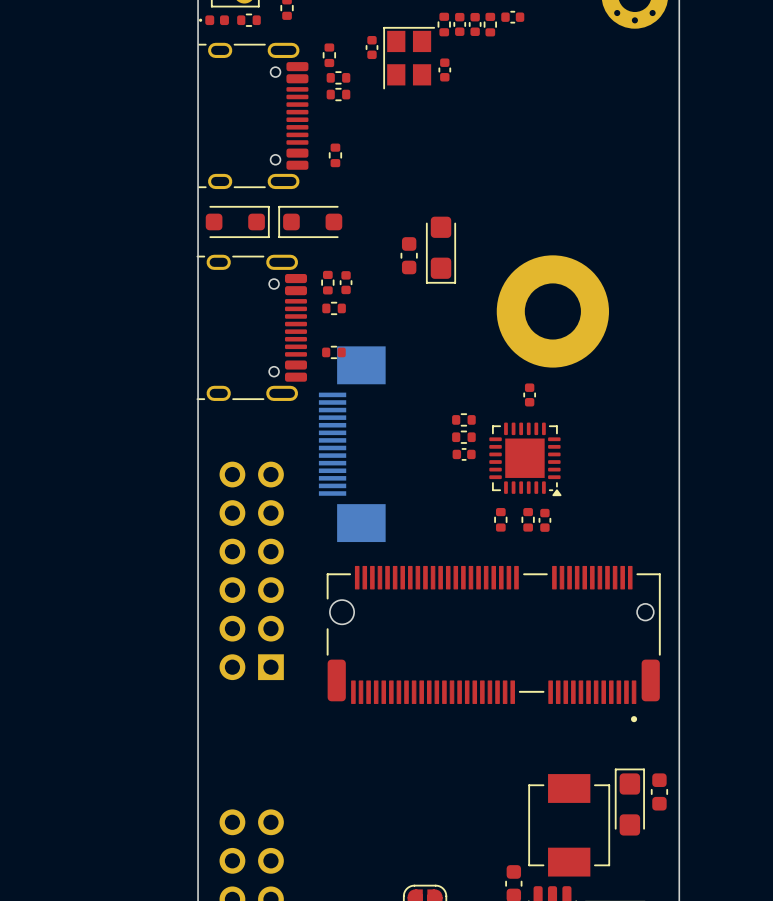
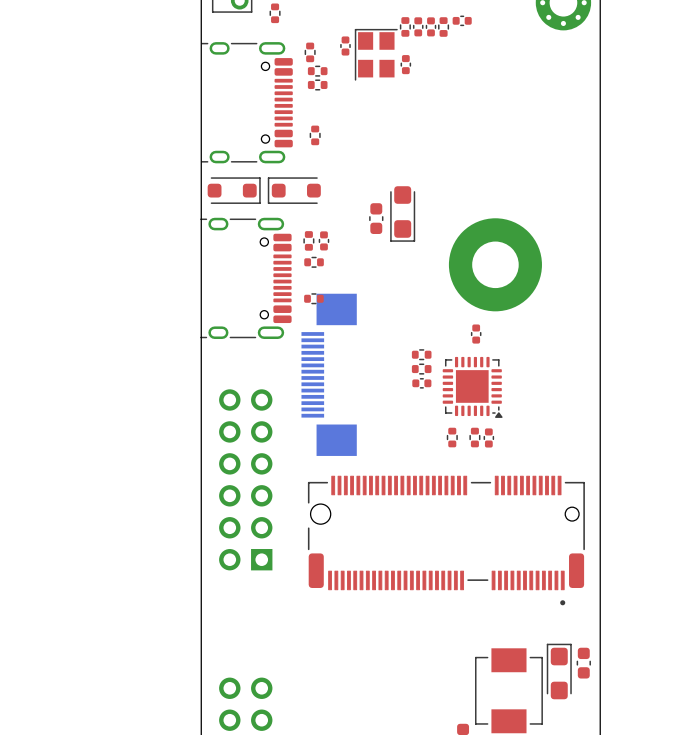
part: (214, 20) -> none
part: (248, 20) -> none

